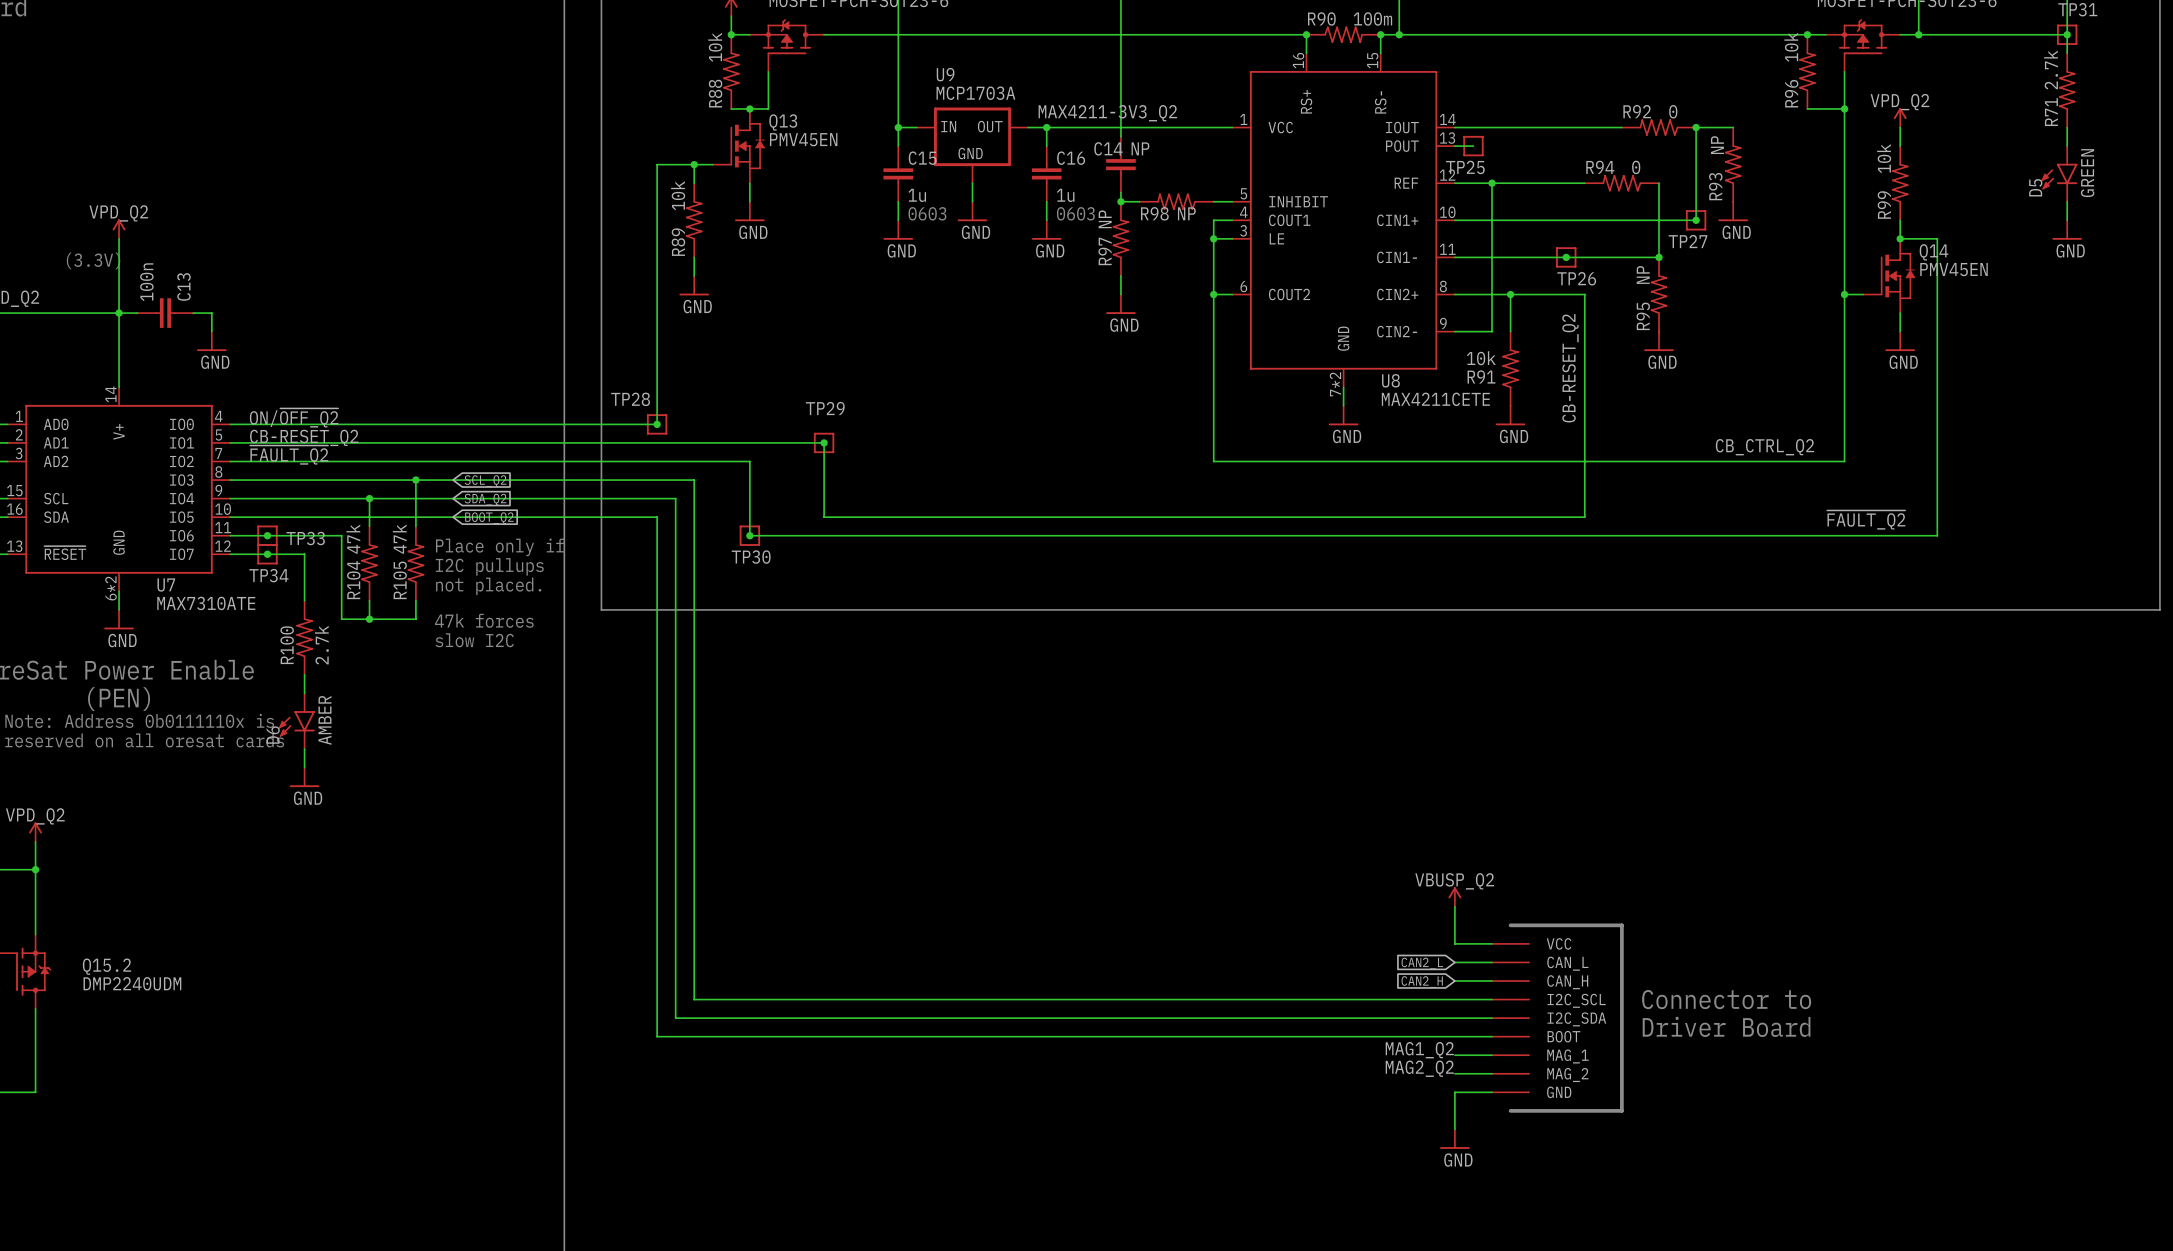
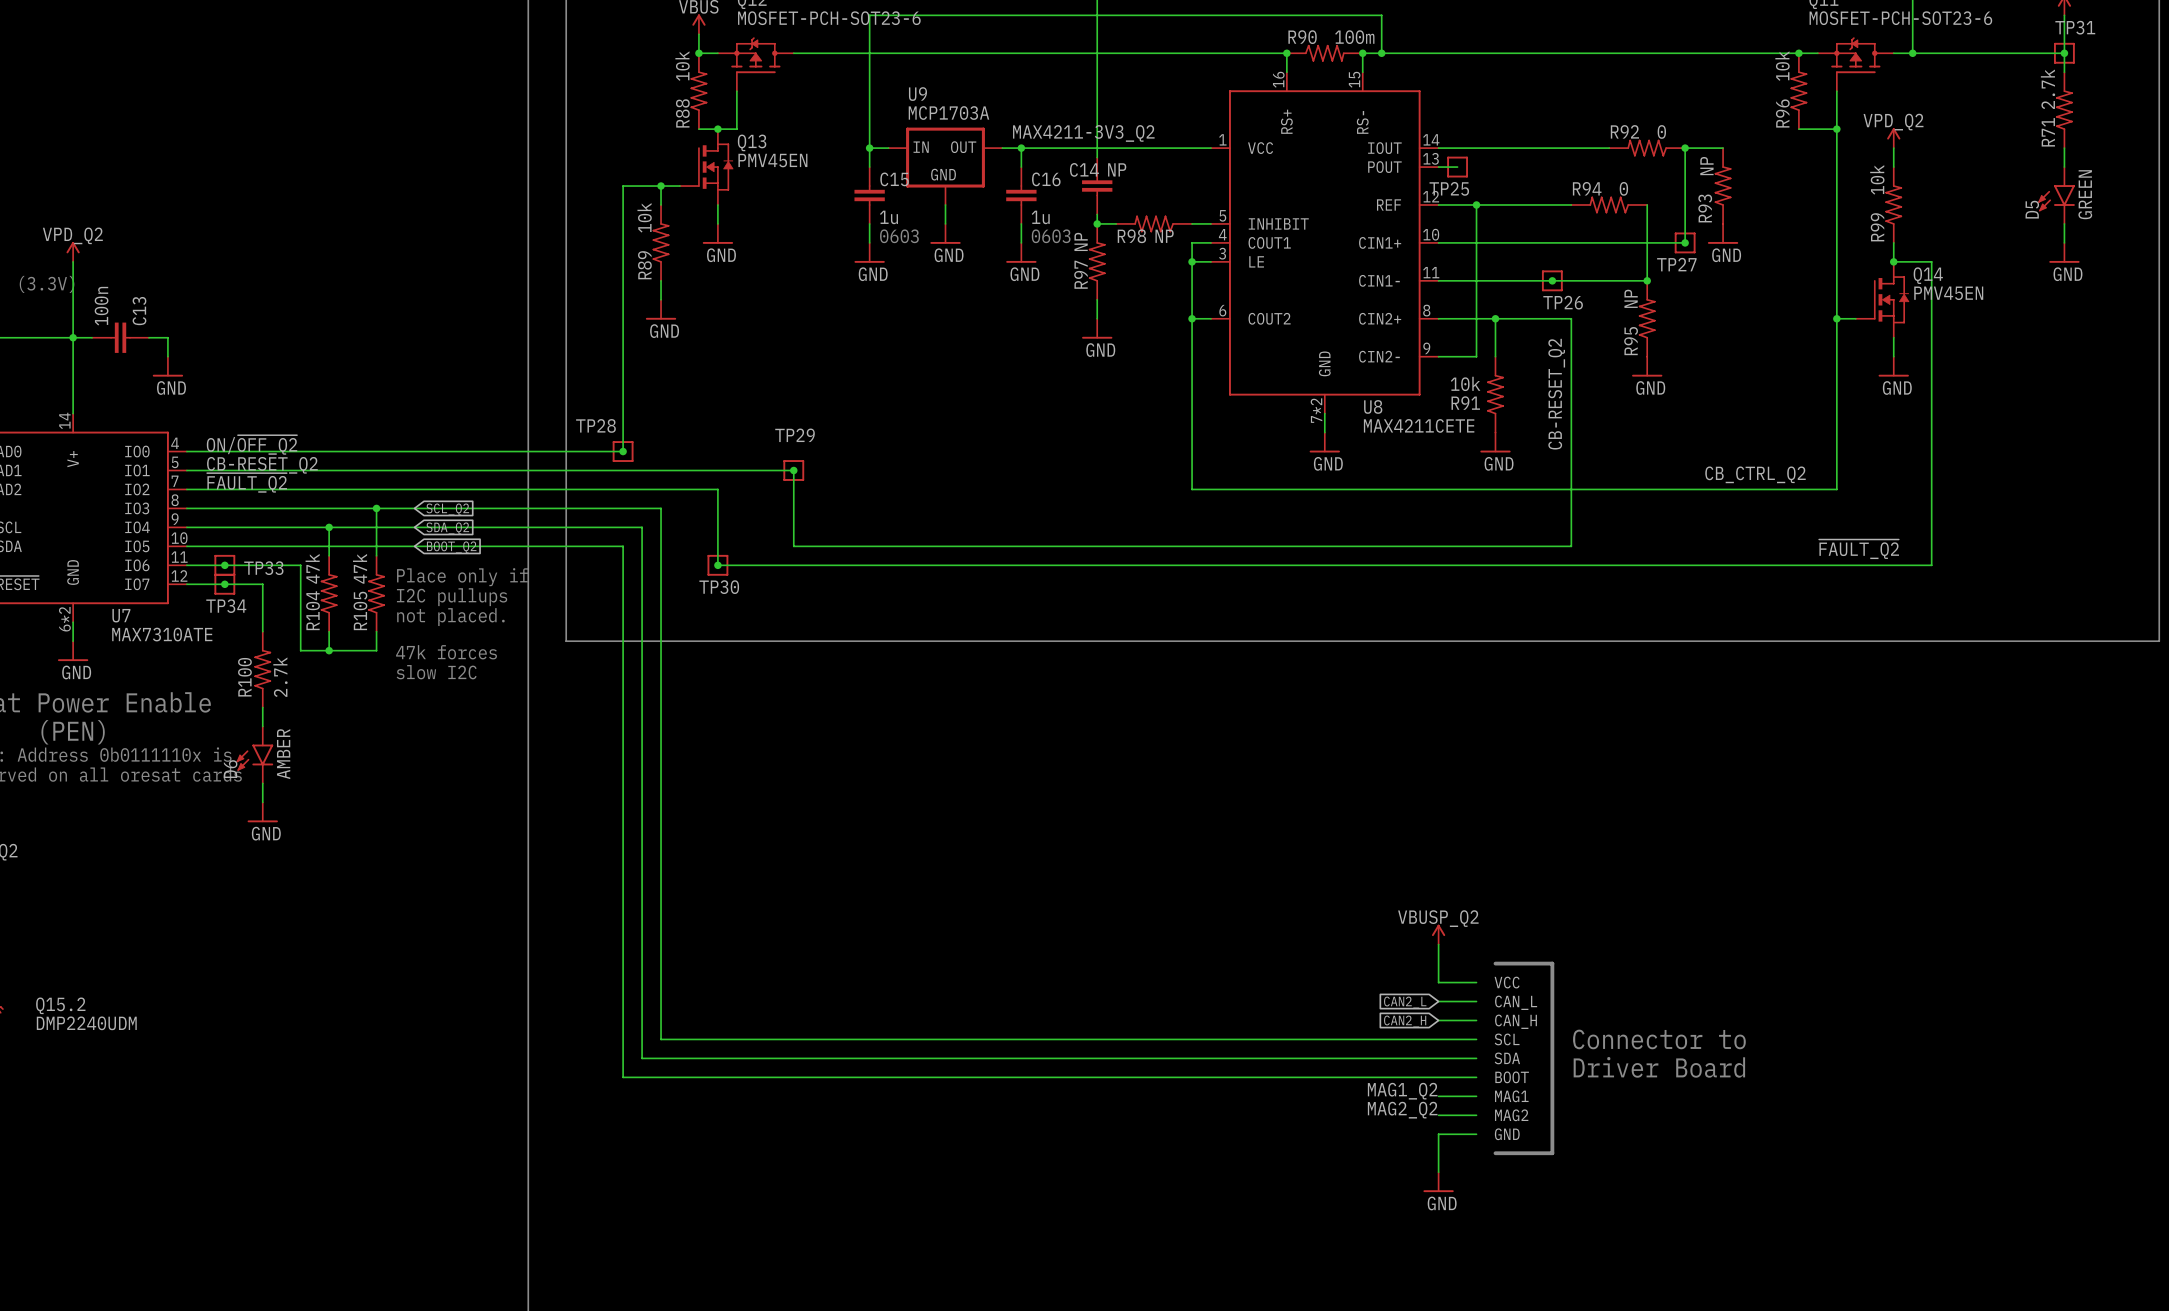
line: (1566, 925) (1621, 925) (1621, 1110) (1566, 1110) -> (1552, 963) (1552, 1153)
text position: Connector to (1726, 999) -> Connector to (1659, 1039)
part: (1510, 1018) -> none
part: none -> (1515, 1058)
text position: Driver Board (1726, 1026) -> Driver Board (1659, 1067)

